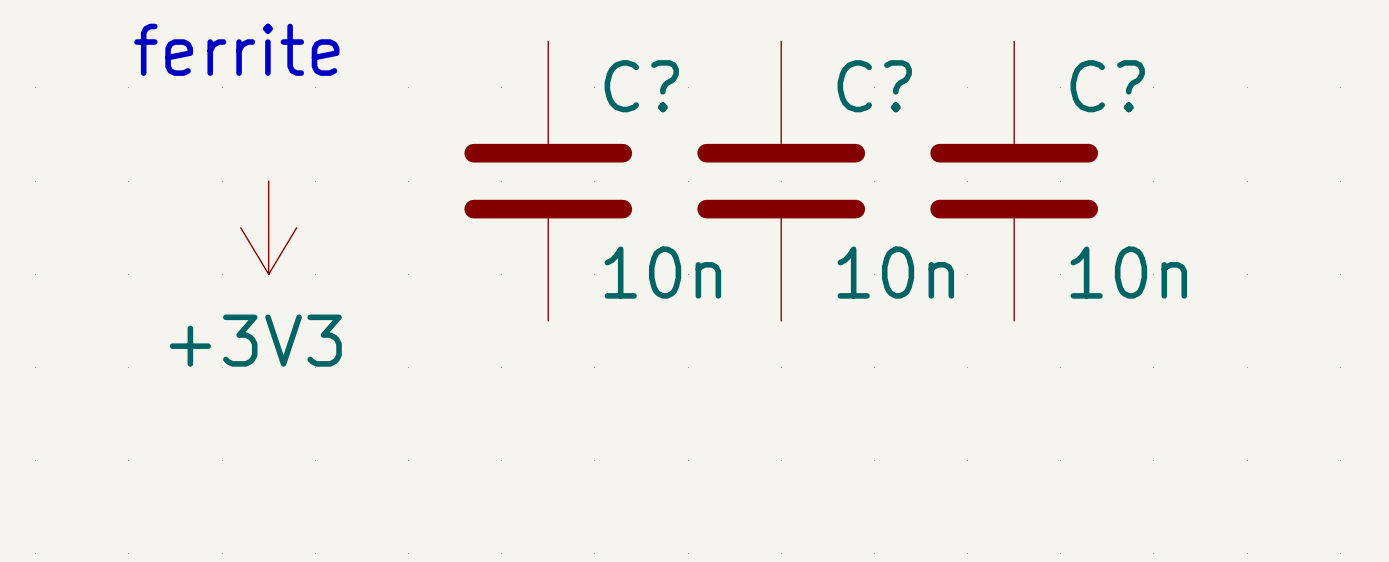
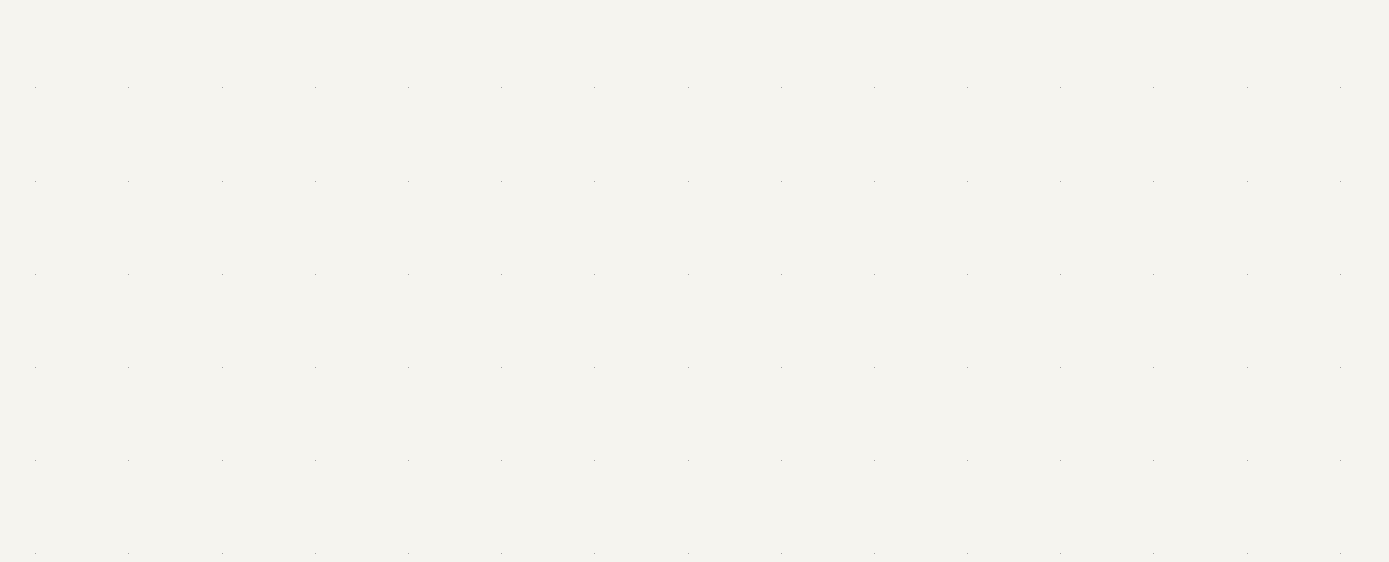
text: ferrite (236, 49) -> none
C?: 10n (548, 181) -> none
C?: 10n (781, 181) -> none
C?: 10n (1014, 181) -> none
power symbol: +3V3 (268, 227) -> none

